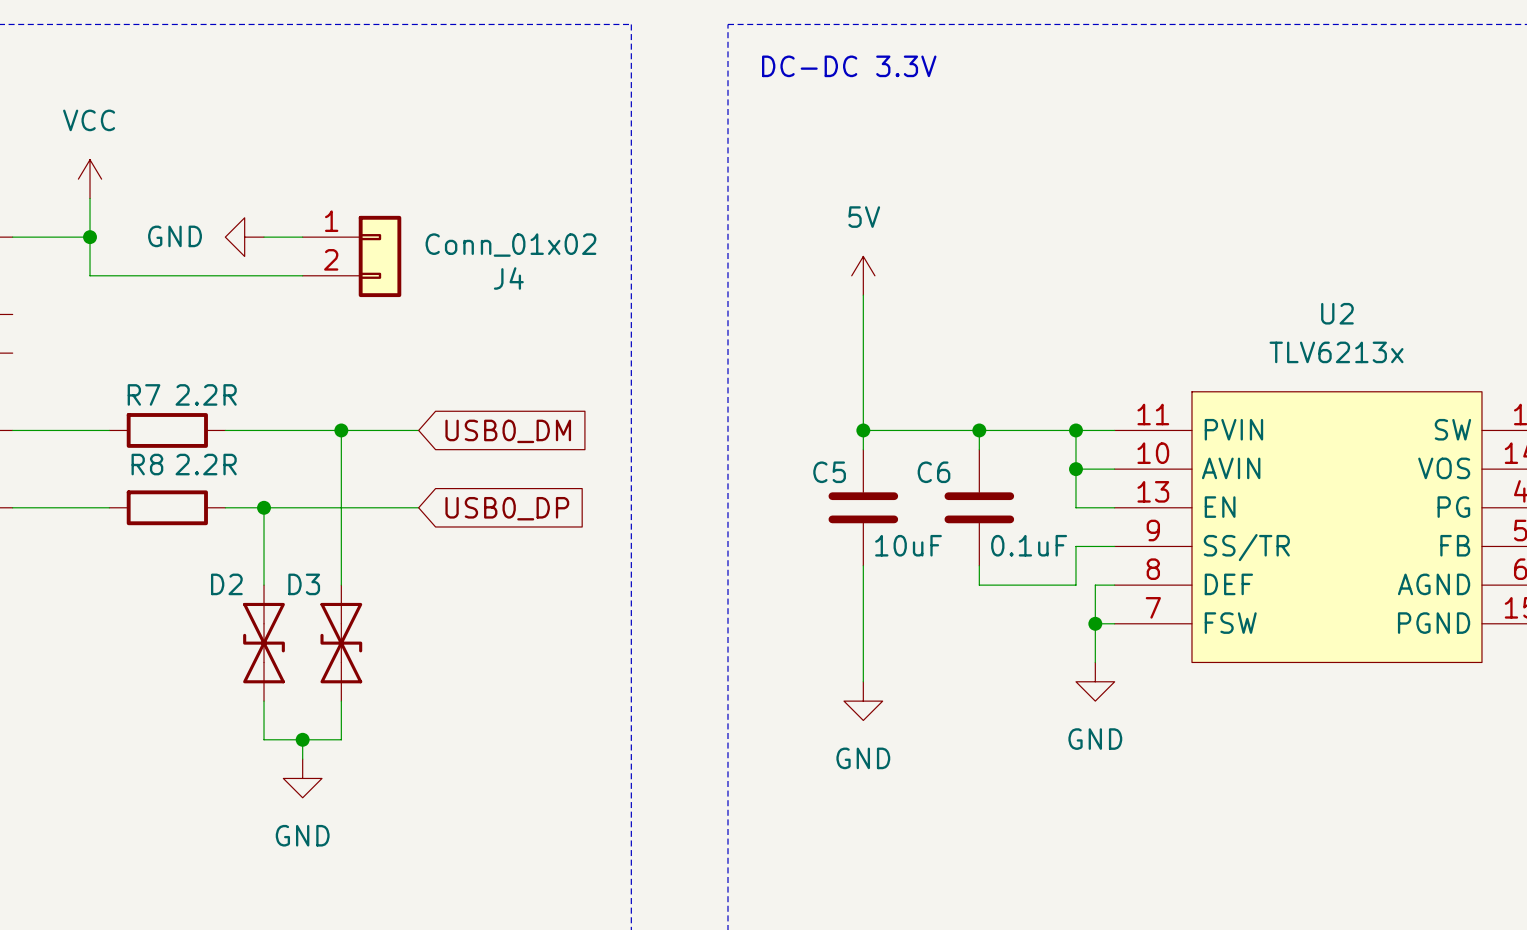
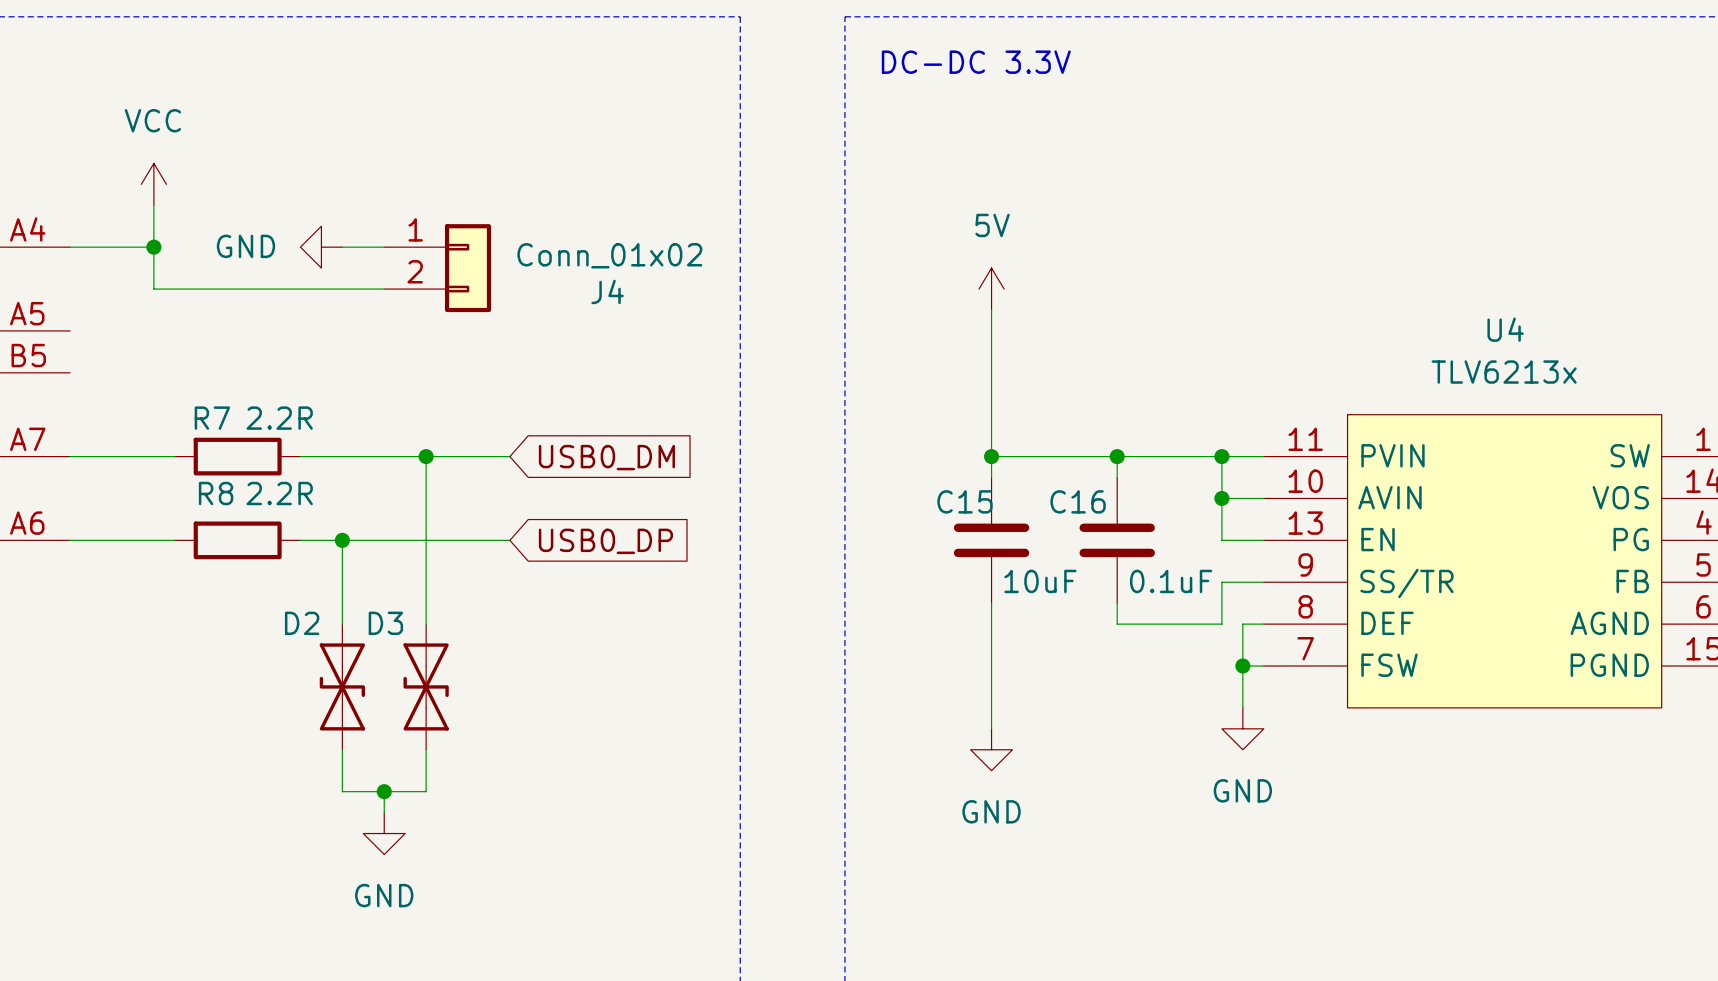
U2 name: U2 (1337, 313) -> U4 (1505, 329)
C5 name: C5 (829, 472) -> C15 (964, 501)
C6 name: C6 (933, 472) -> C16 (1078, 501)

